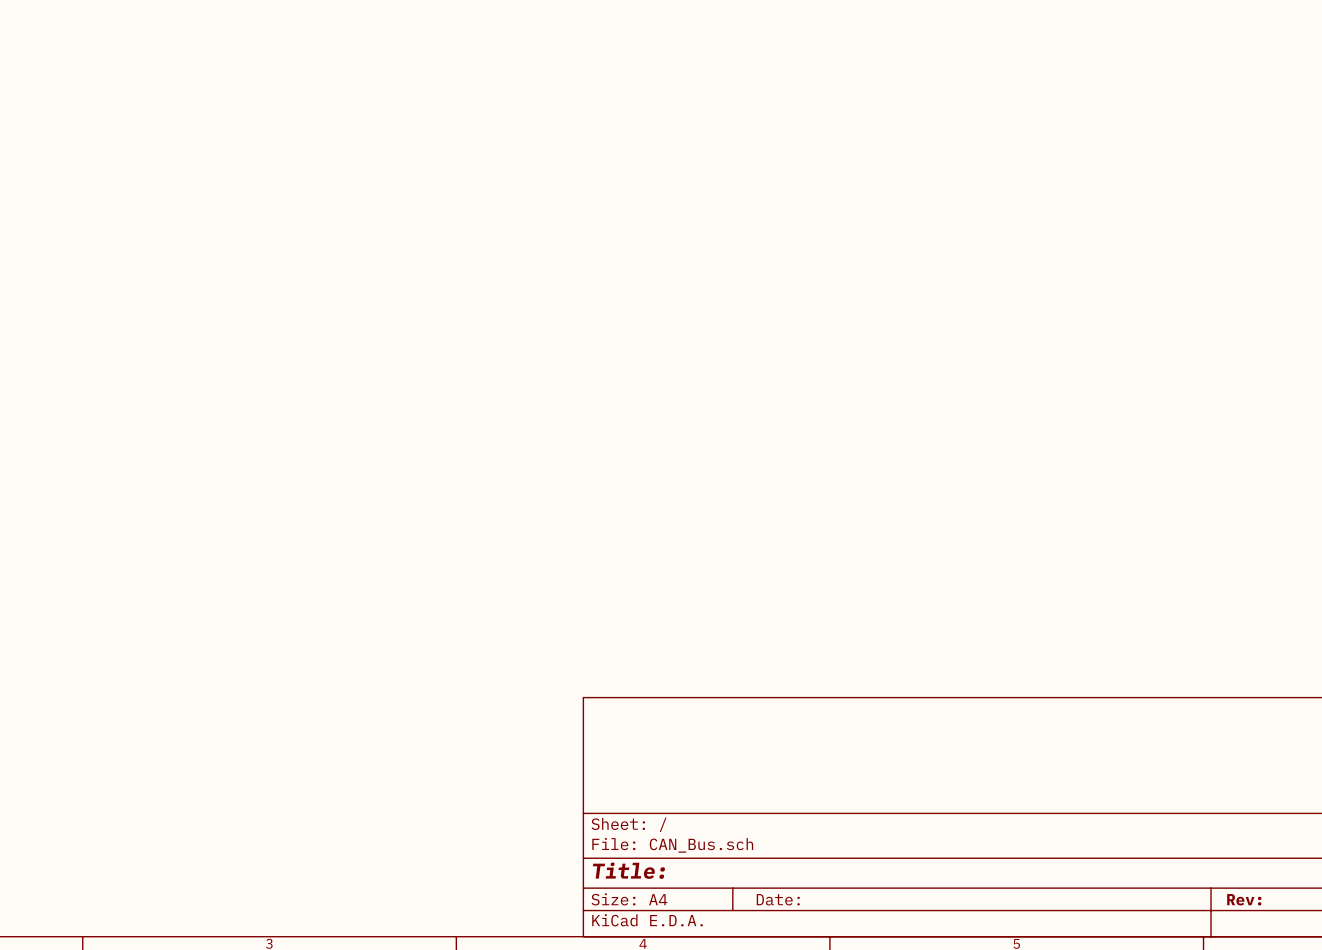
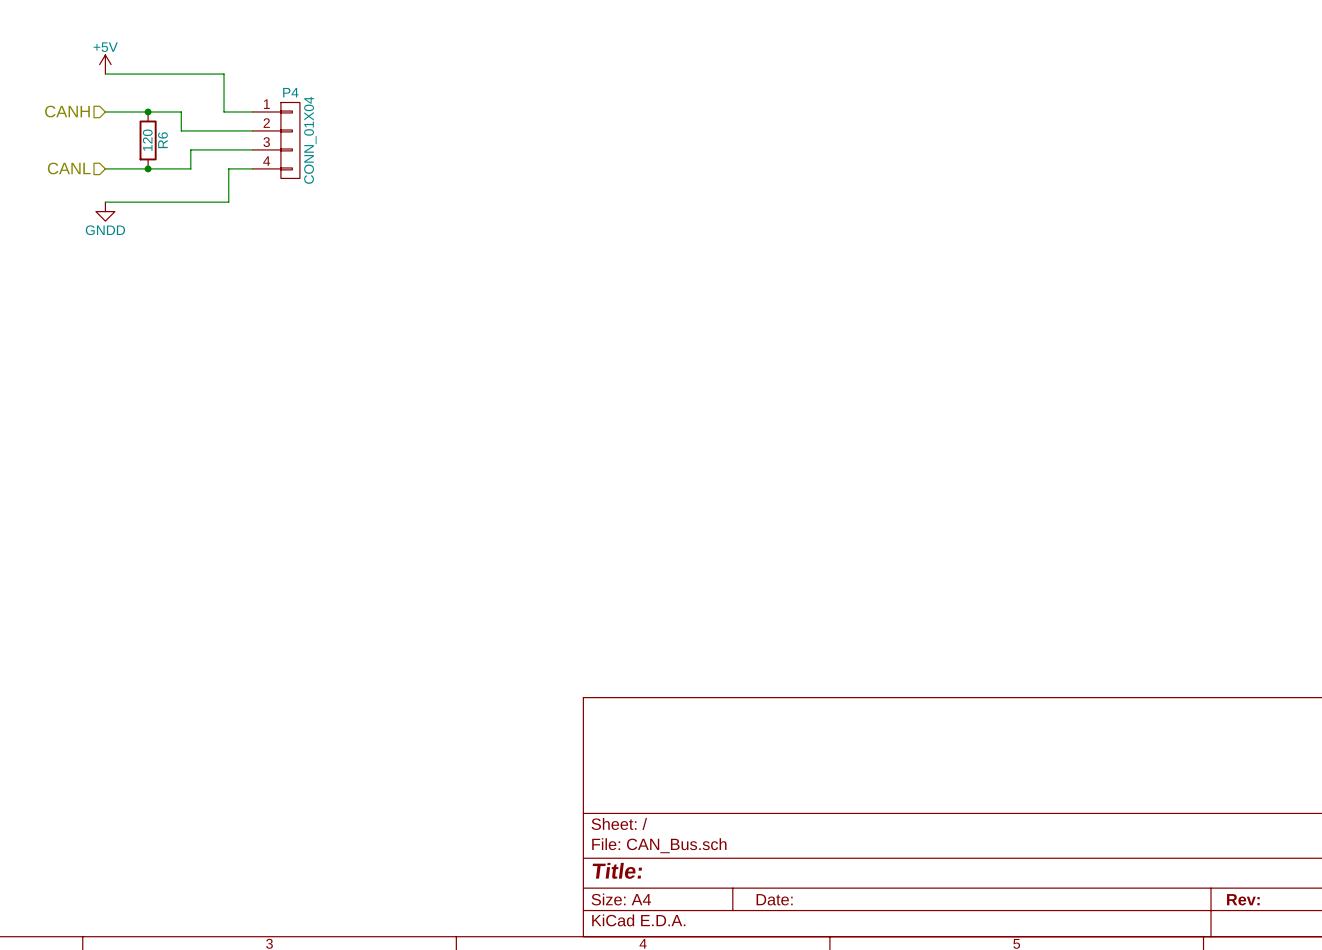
power symbol: none -> +5V (105, 64)
wire: none -> (105, 74) (224, 74) (224, 111) (252, 111)
hierarchical label: none -> CANH (67, 111)
wire: none -> (105, 111) (181, 111) (181, 130) (252, 130)
junction: none -> (148, 111)
R6: none -> 120 (148, 140)
P4: none -> CONN_01X04 (276, 140)
wire: none -> (252, 149) (190, 149) (190, 168) (105, 168)
hierarchical label: none -> CANL (69, 168)
junction: none -> (148, 168)
wire: none -> (252, 168) (228, 168) (228, 202) (105, 202)
power symbol: none -> GNDD (105, 211)

